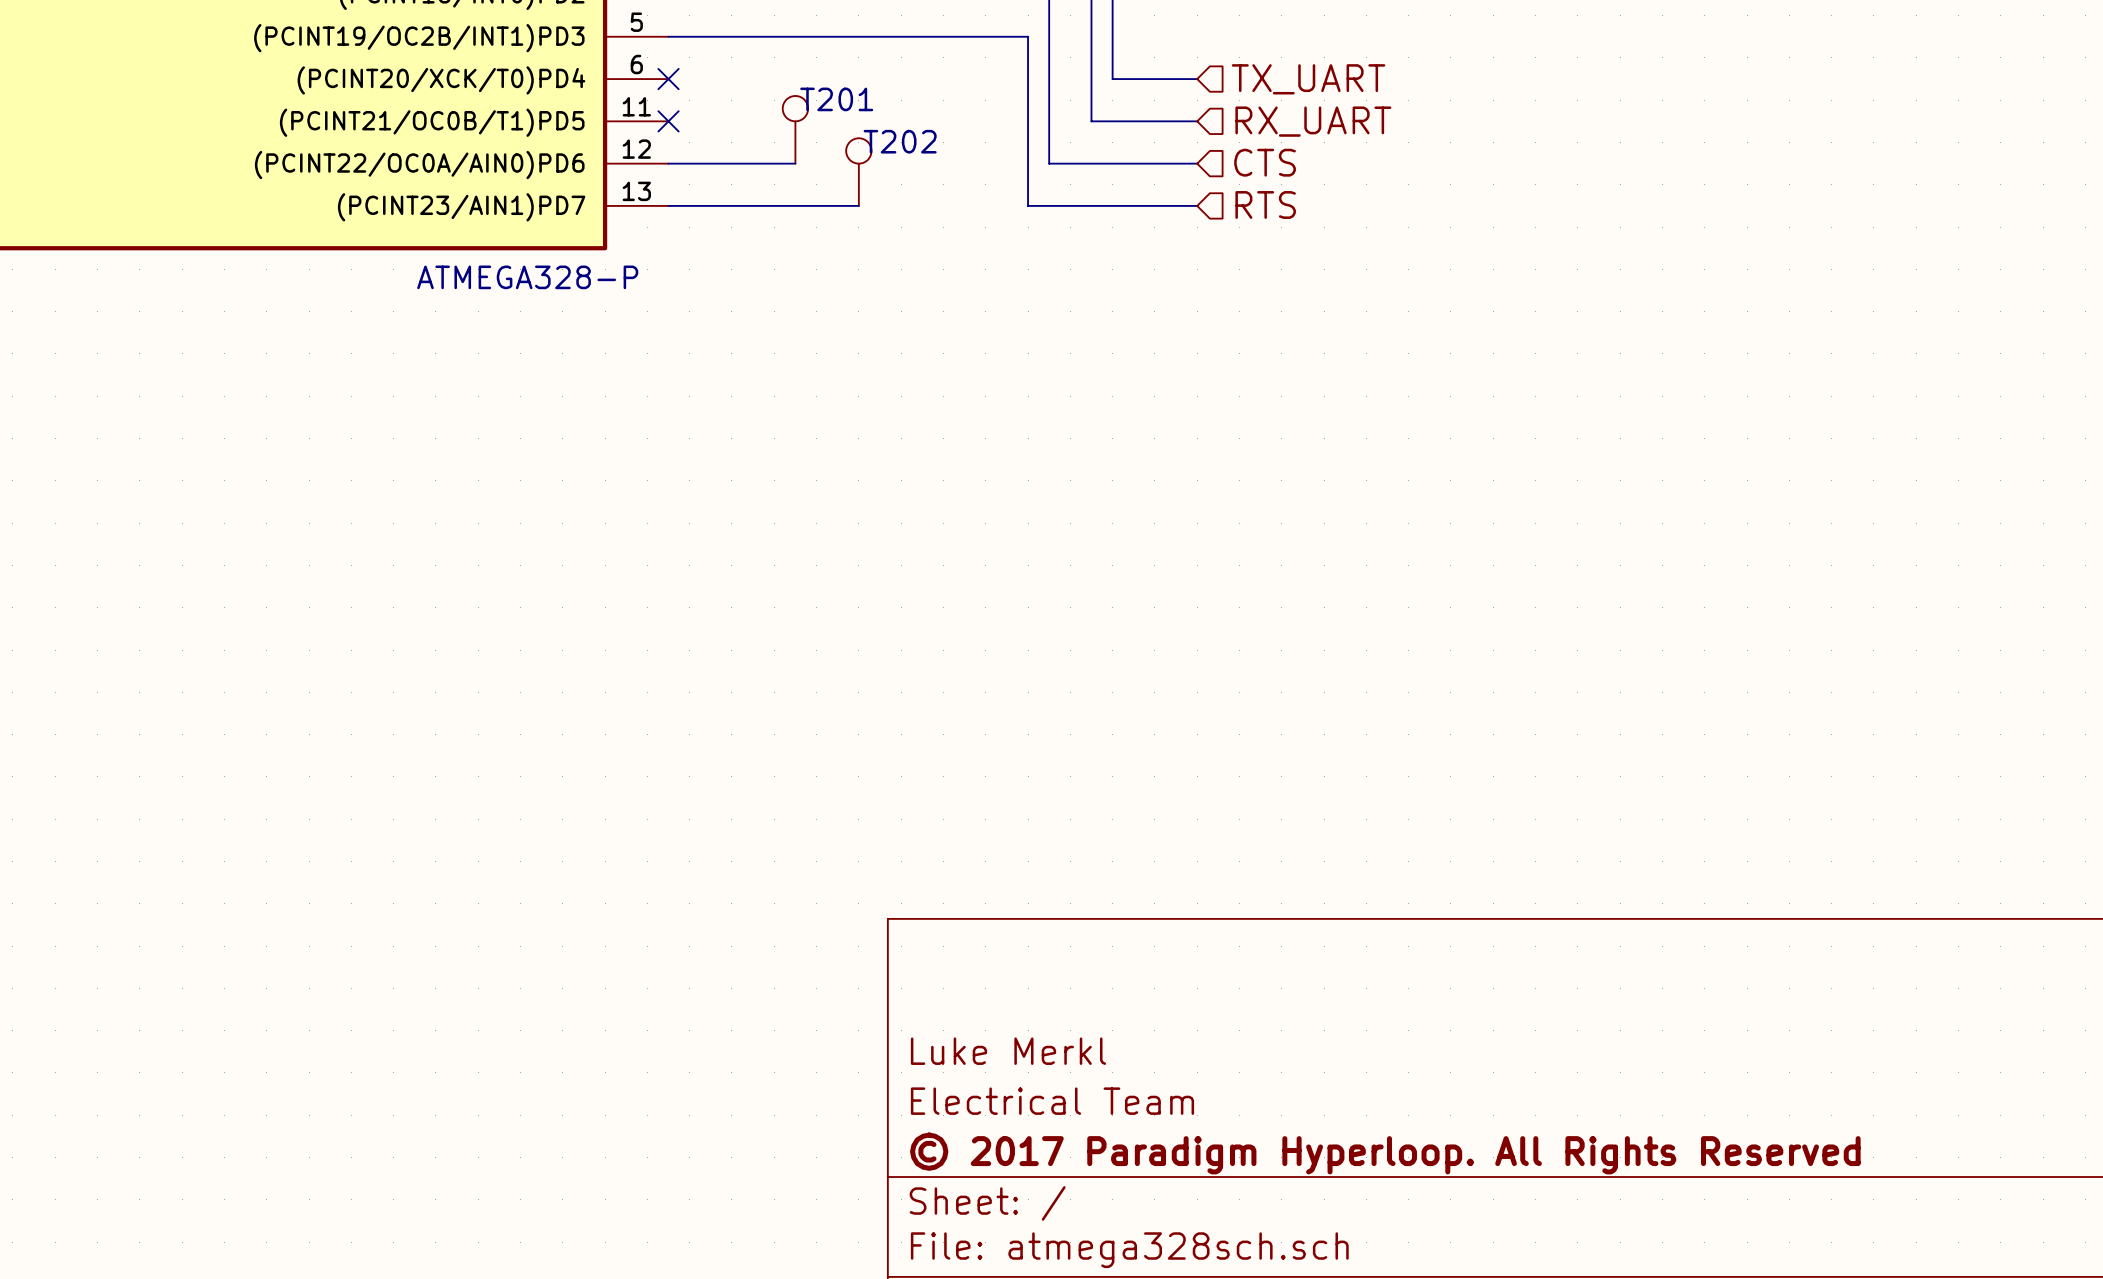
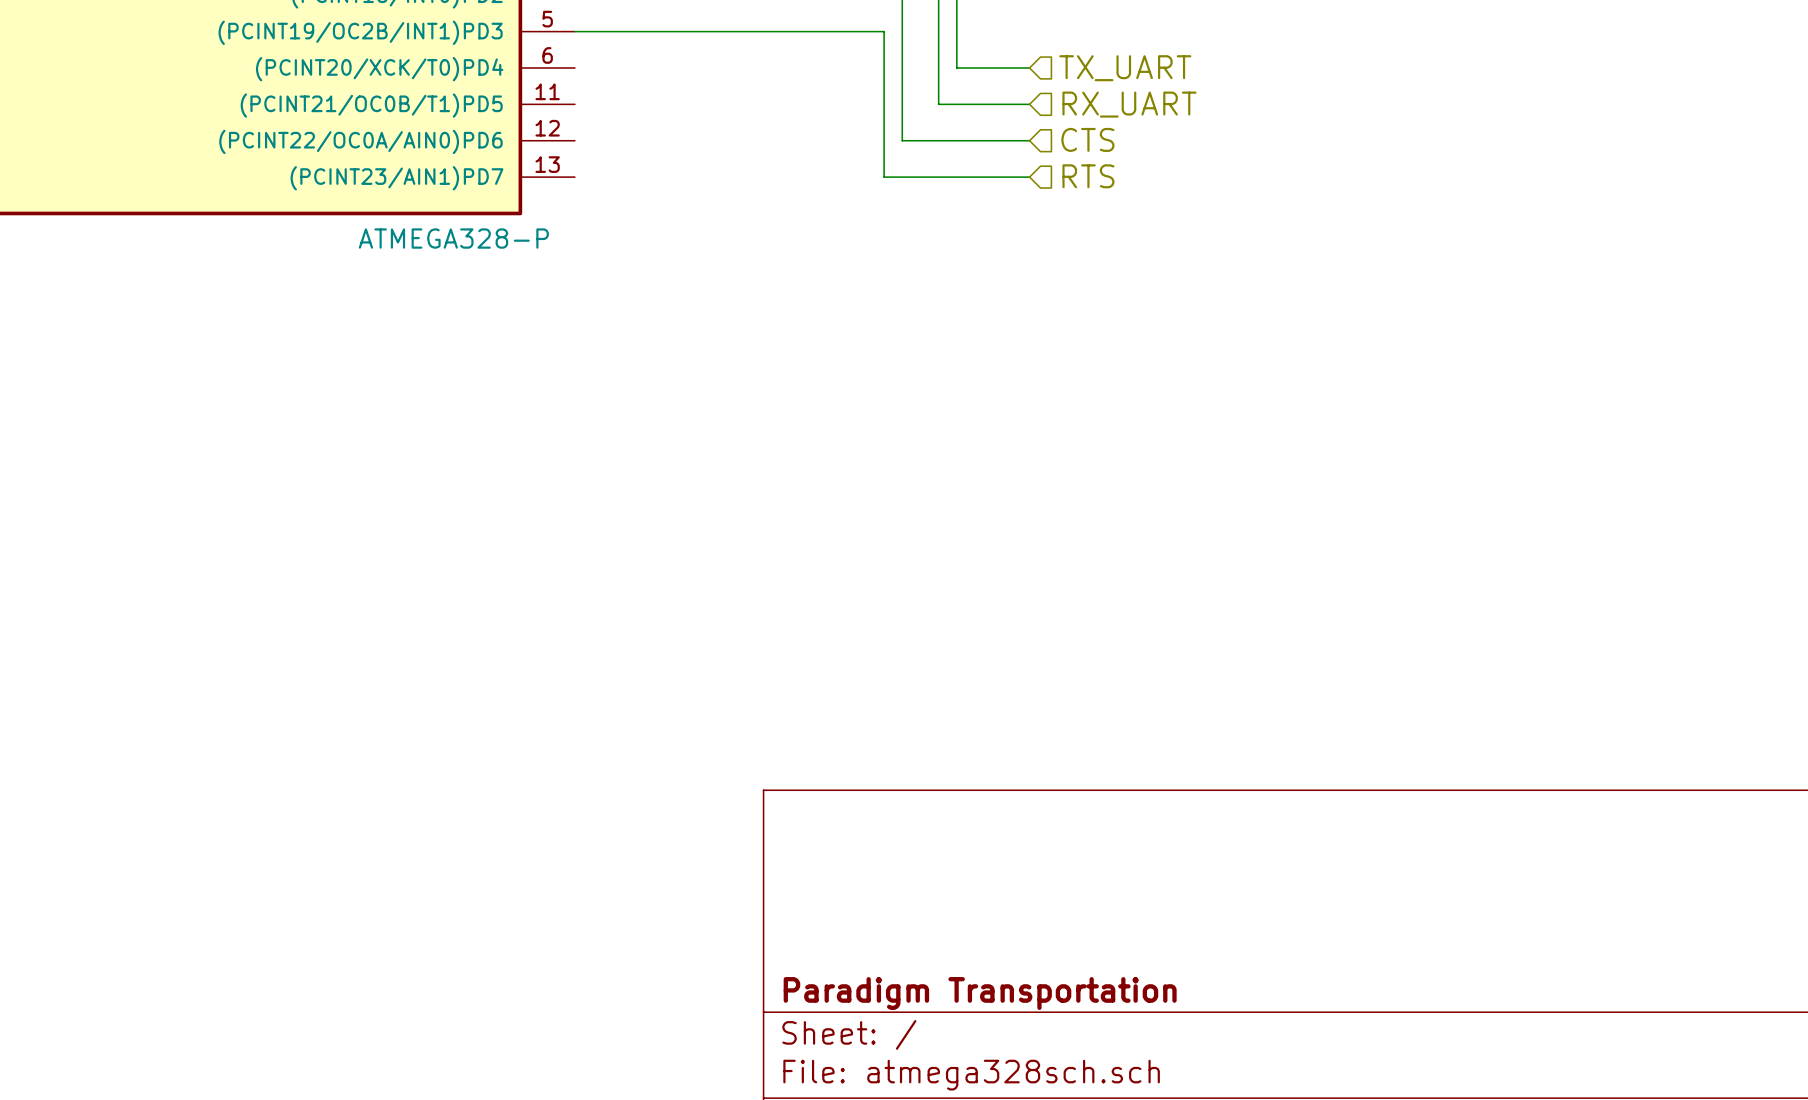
no-connect mark: (668, 79) -> none
no-connect mark: (668, 121) -> none
T201: (795, 129) -> none
wire: (668, 163) (795, 163) -> none
T202: (858, 172) -> none
wire: (668, 205) (858, 205) -> none
title block: Luke Merkl (1008, 1051) -> none
title block: Electrical Team (1052, 1101) -> none
title block: © 2017 Paradigm Hyperloop. All Rights Reserved (1385, 1153) -> Paradigm Transportation (980, 993)

